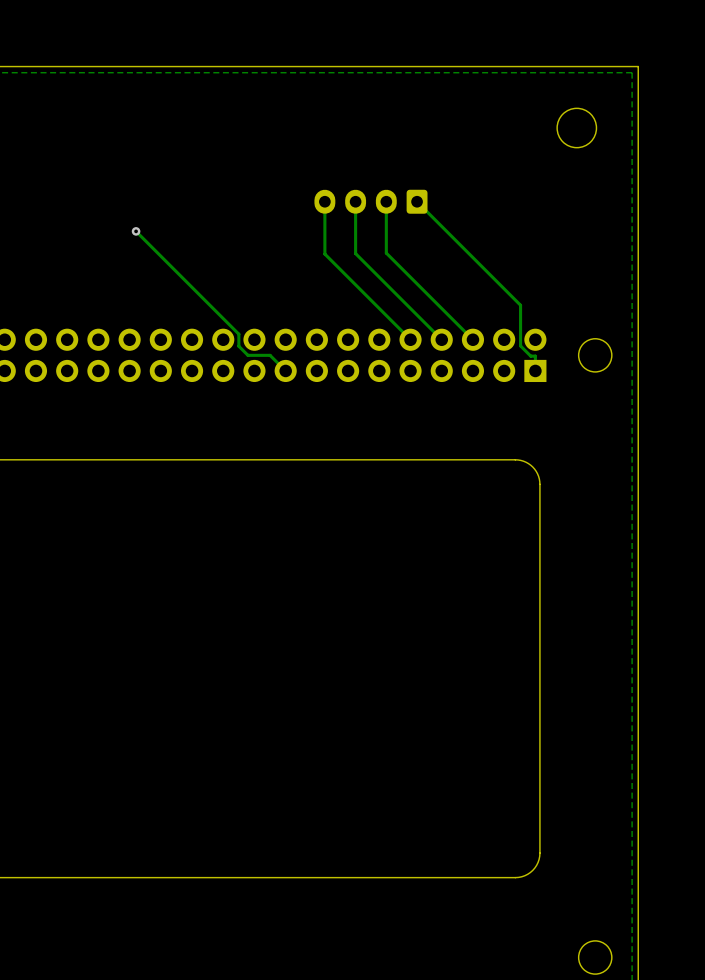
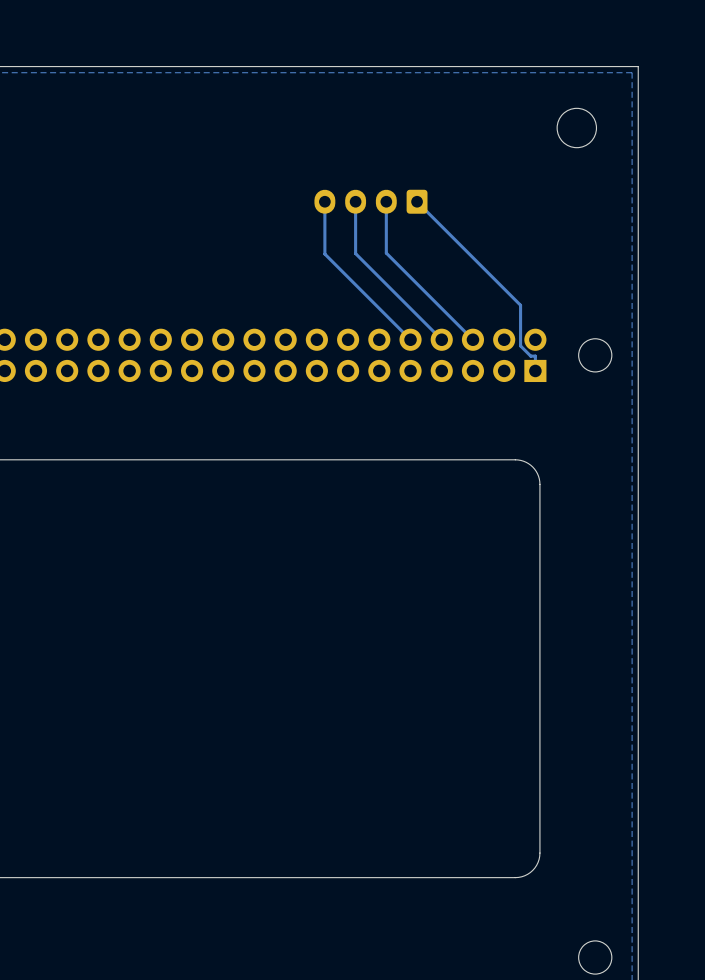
track: (136, 231) (238, 334) (238, 346) (247, 355) (270, 355) (285, 370) -> none
via: (136, 231) -> none

